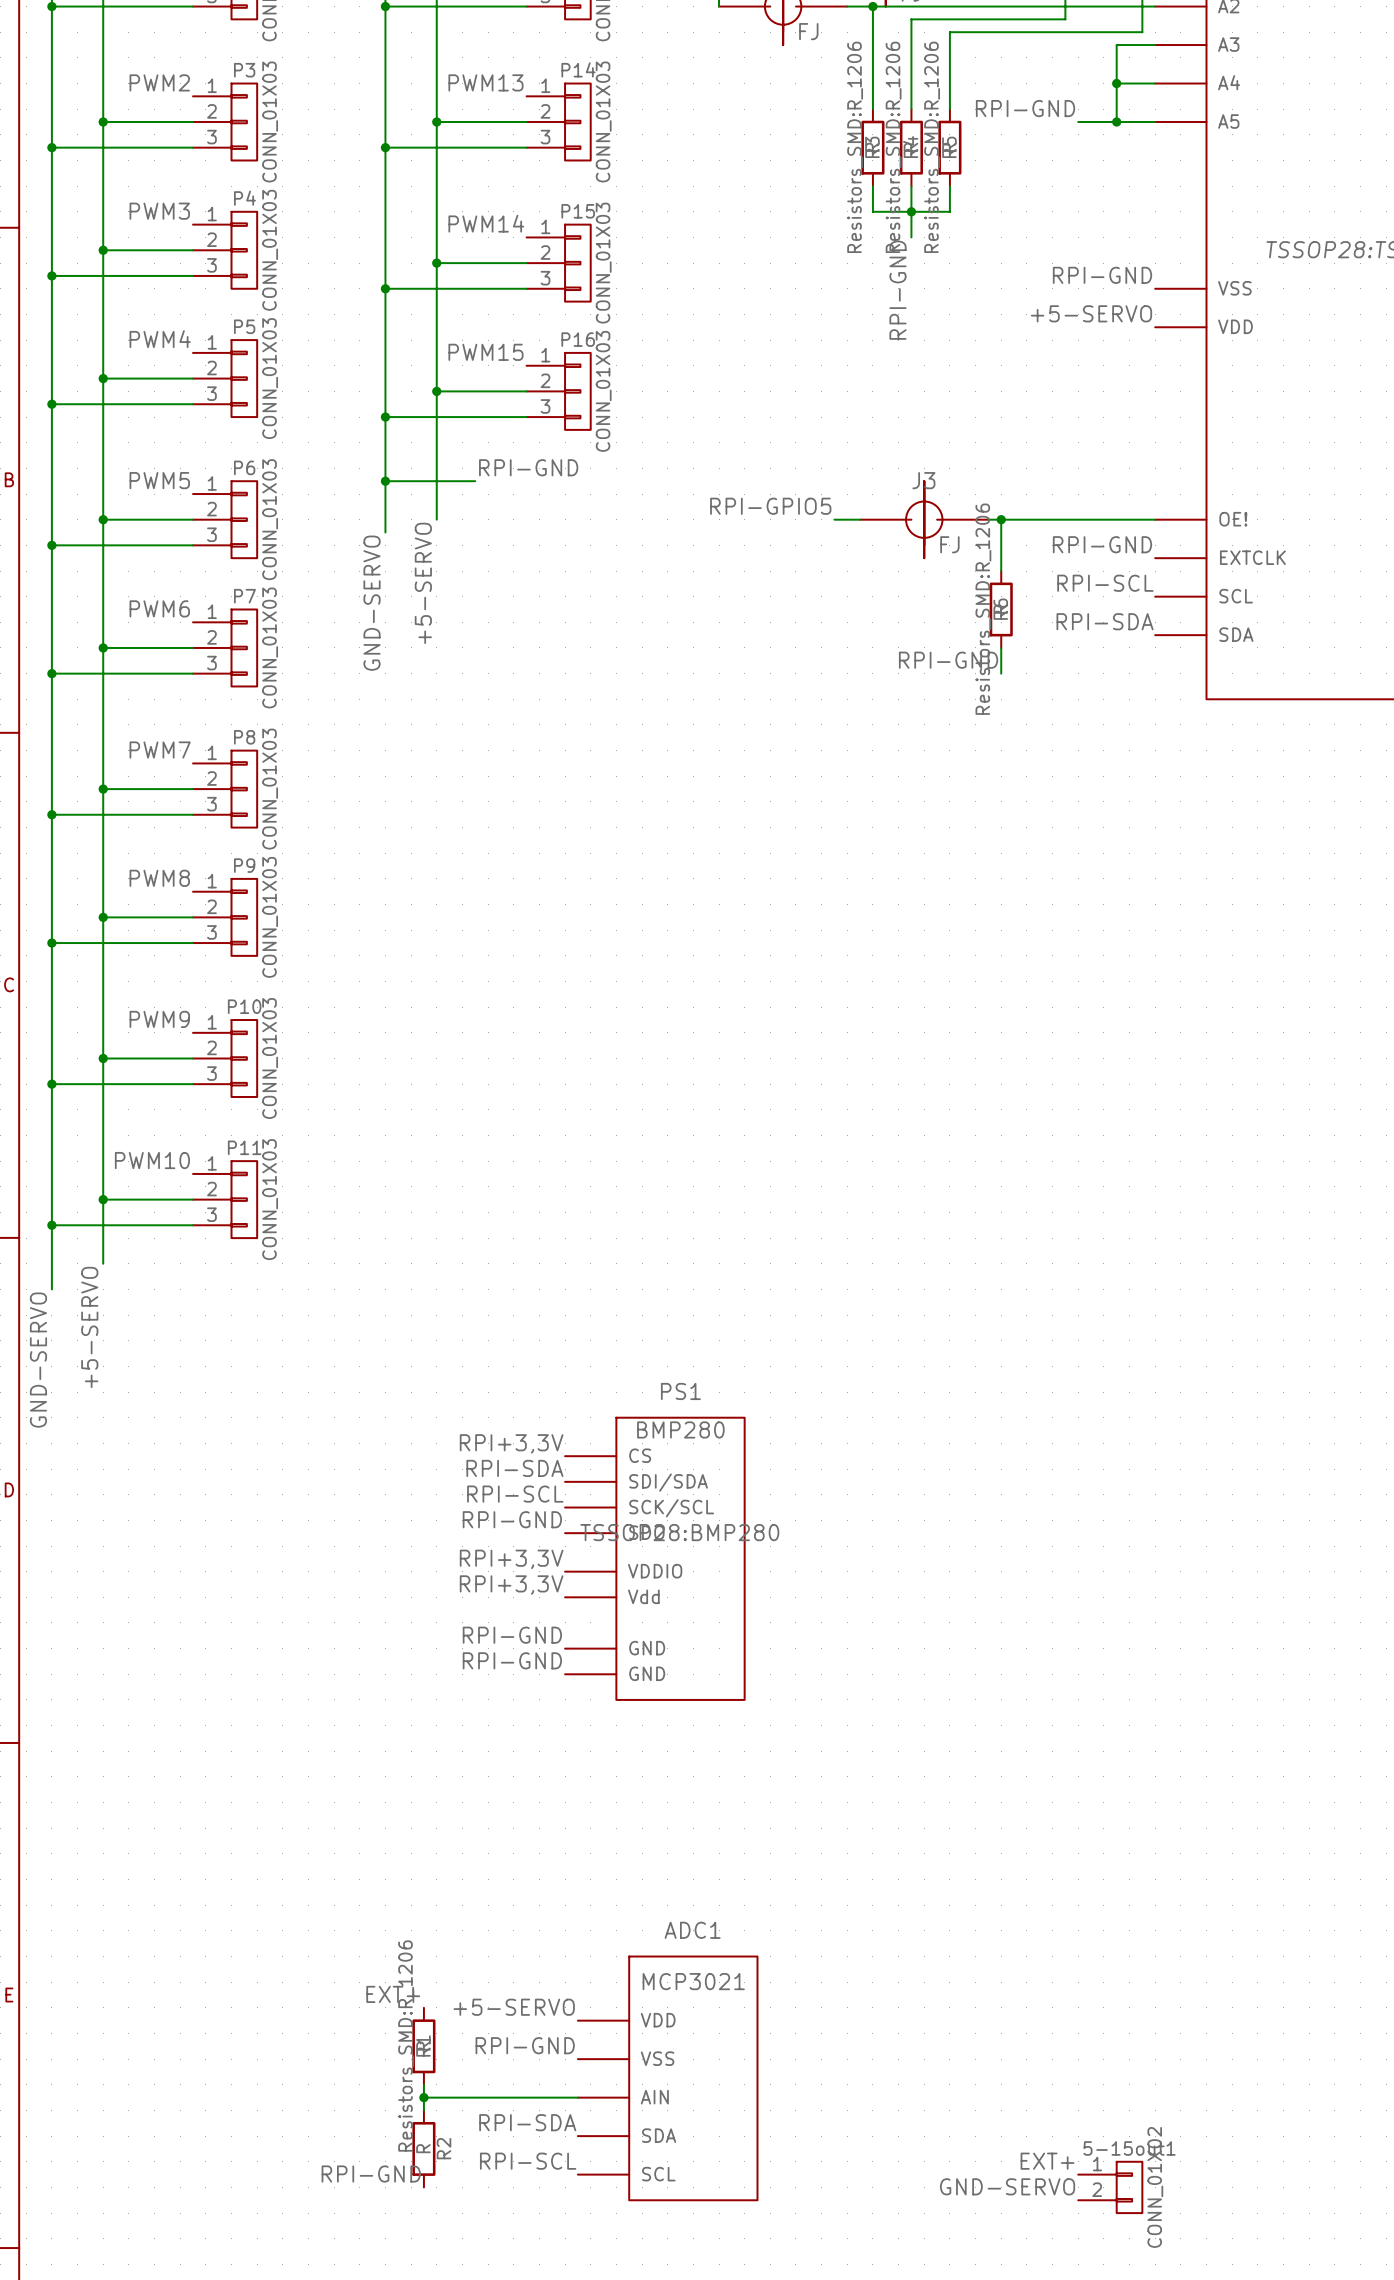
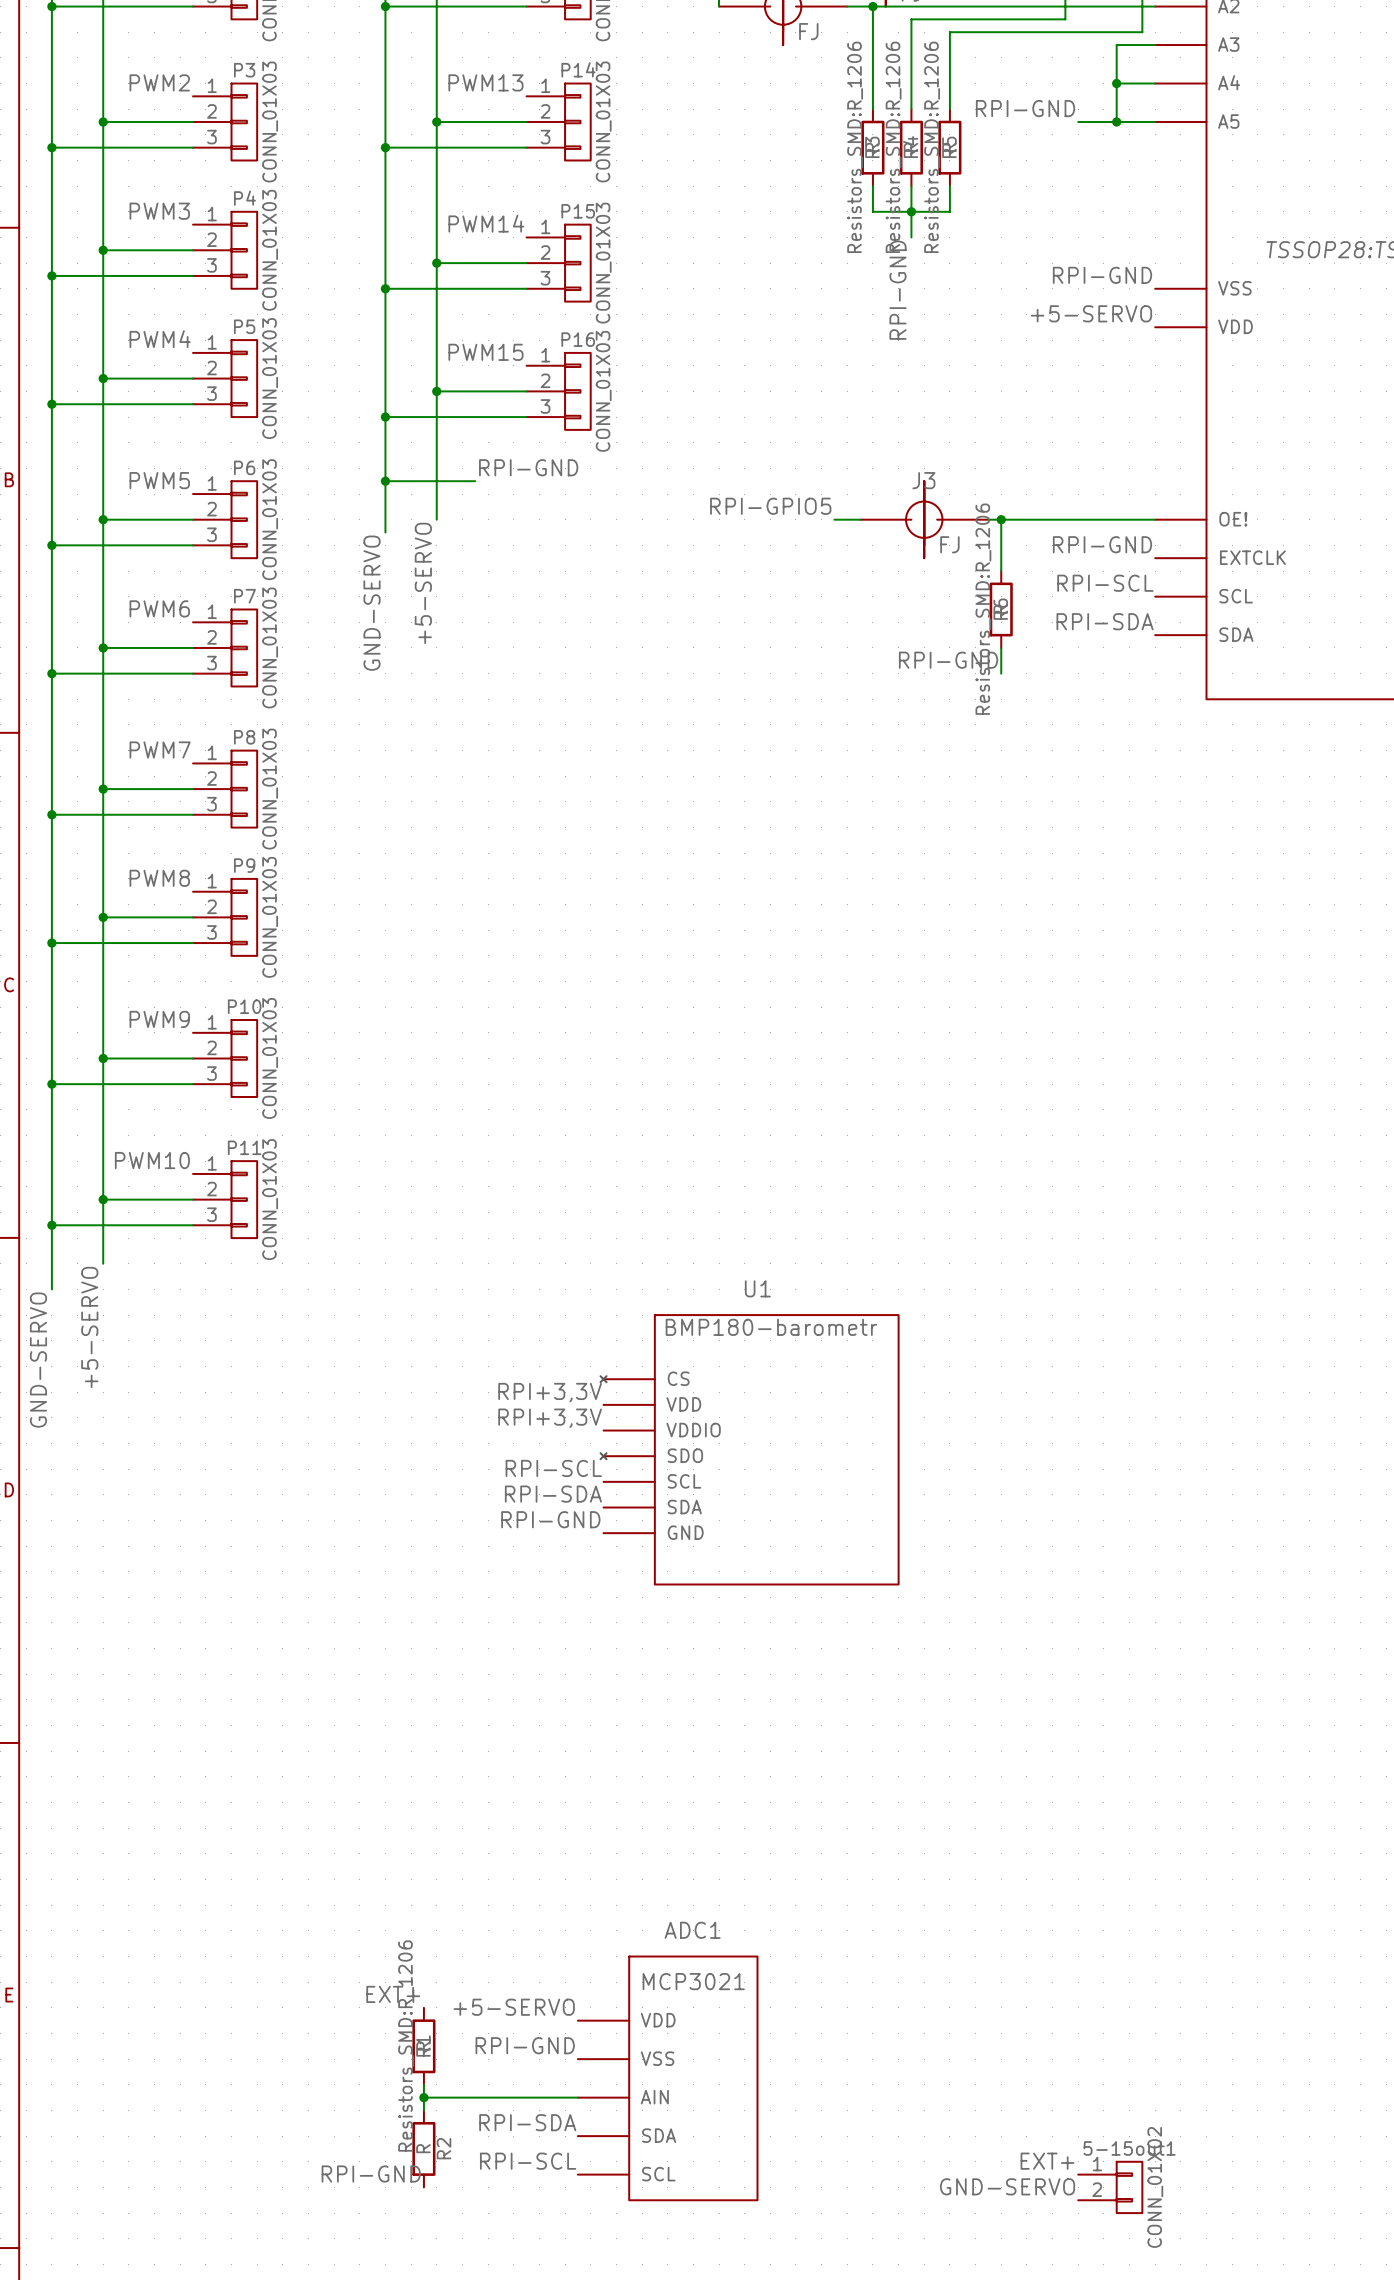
label: none -> RPI+3,3V (550, 1392)
label position: RPI+3,3V (511, 1443) -> RPI+3,3V (550, 1418)
U1: none -> BMP180-barometr (749, 1449)
label position: RPI-SDA (514, 1468) -> RPI-SDA (553, 1494)
label position: RPI-SCL (515, 1494) -> RPI-SCL (553, 1468)
label position: RPI-GND (512, 1519) -> RPI-GND (550, 1519)
PS1: BMP280 (654, 1558) -> none
label: RPI+3,3V (511, 1559) -> none
label: RPI+3,3V (511, 1584) -> none
label: RPI-GND (512, 1635) -> none
label: RPI-GND (512, 1660) -> none

